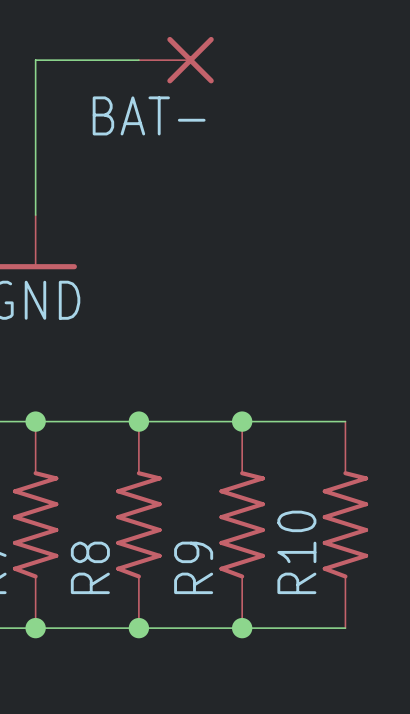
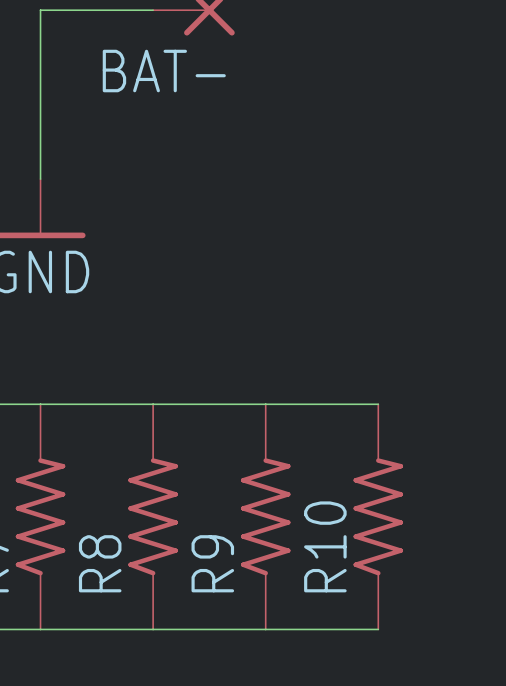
junction: (35, 421) -> none
junction: (138, 421) -> none
junction: (242, 421) -> none
junction: (35, 628) -> none
junction: (138, 628) -> none
junction: (242, 628) -> none

